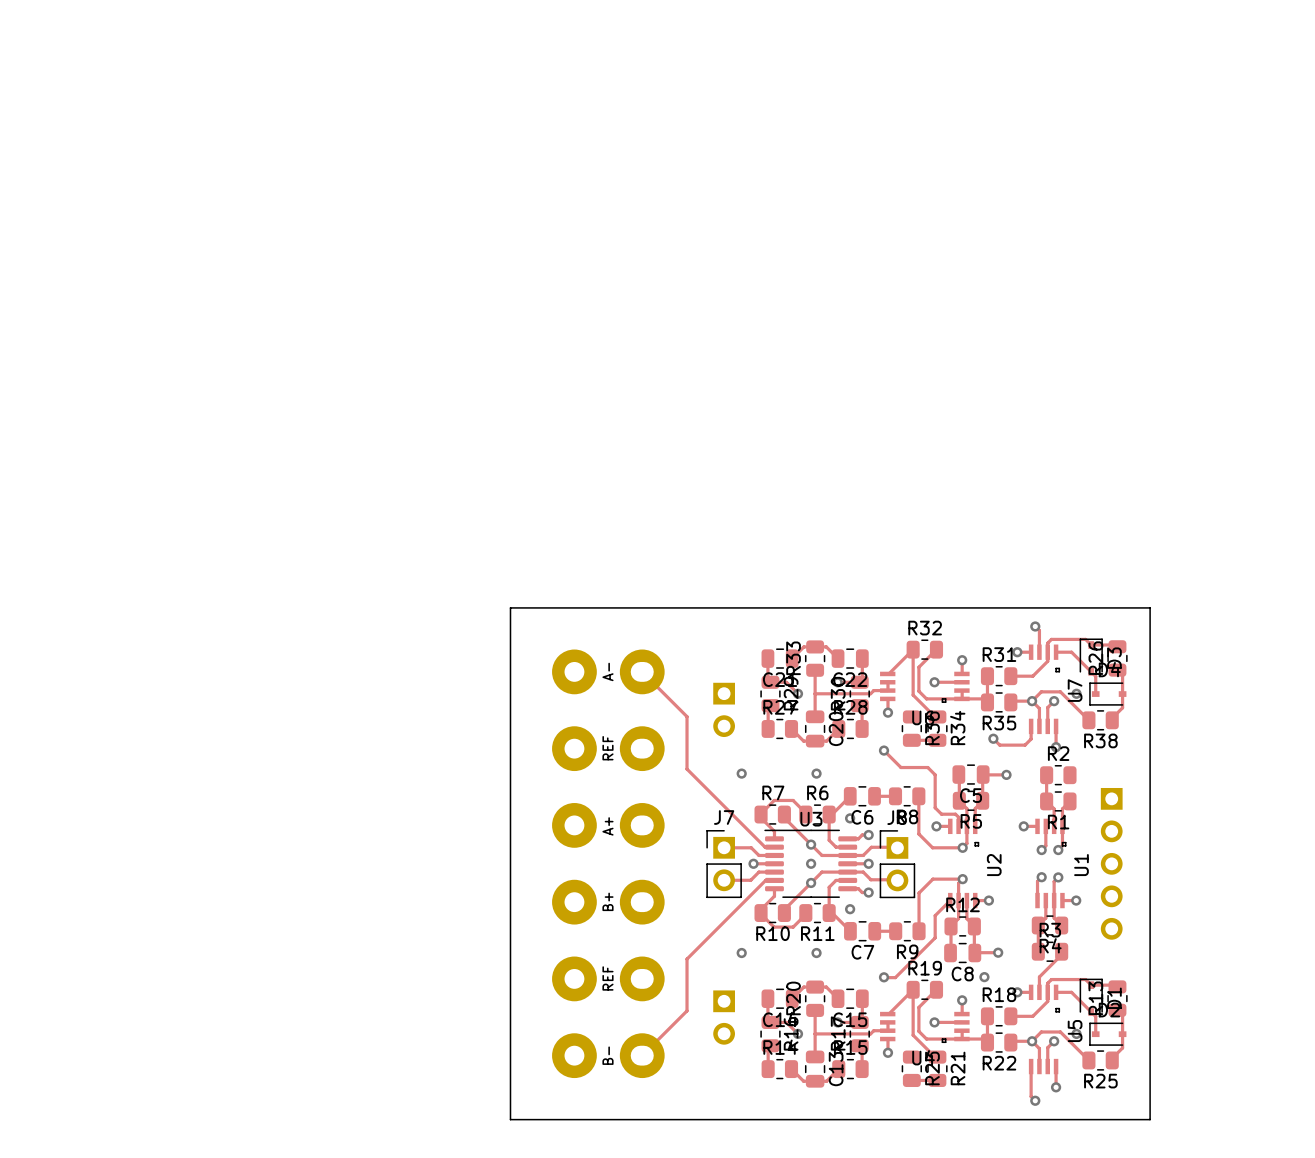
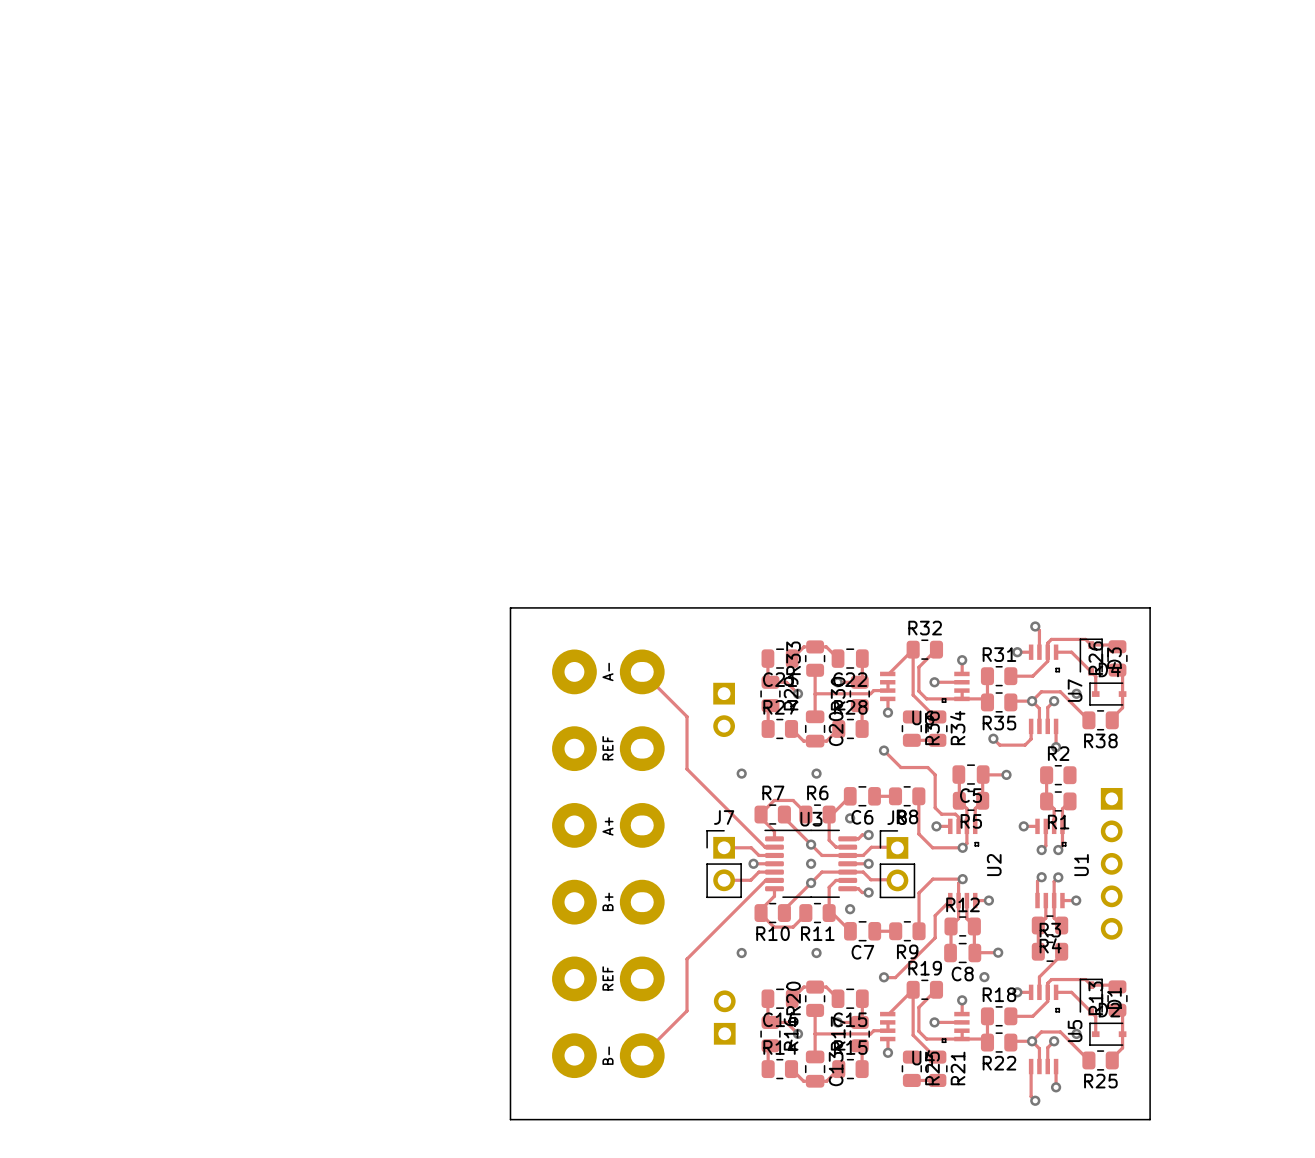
part rotation: 0° (724, 1017) -> 180° (724, 1017)

